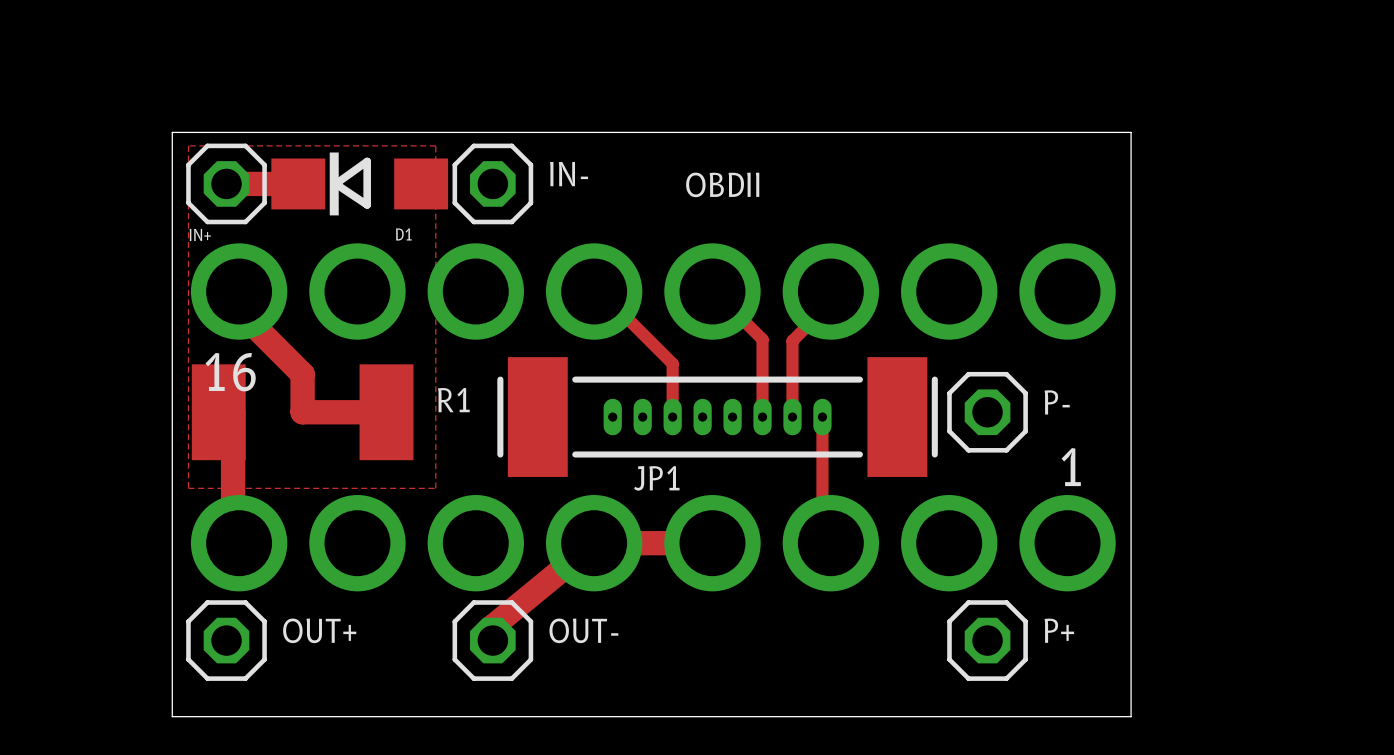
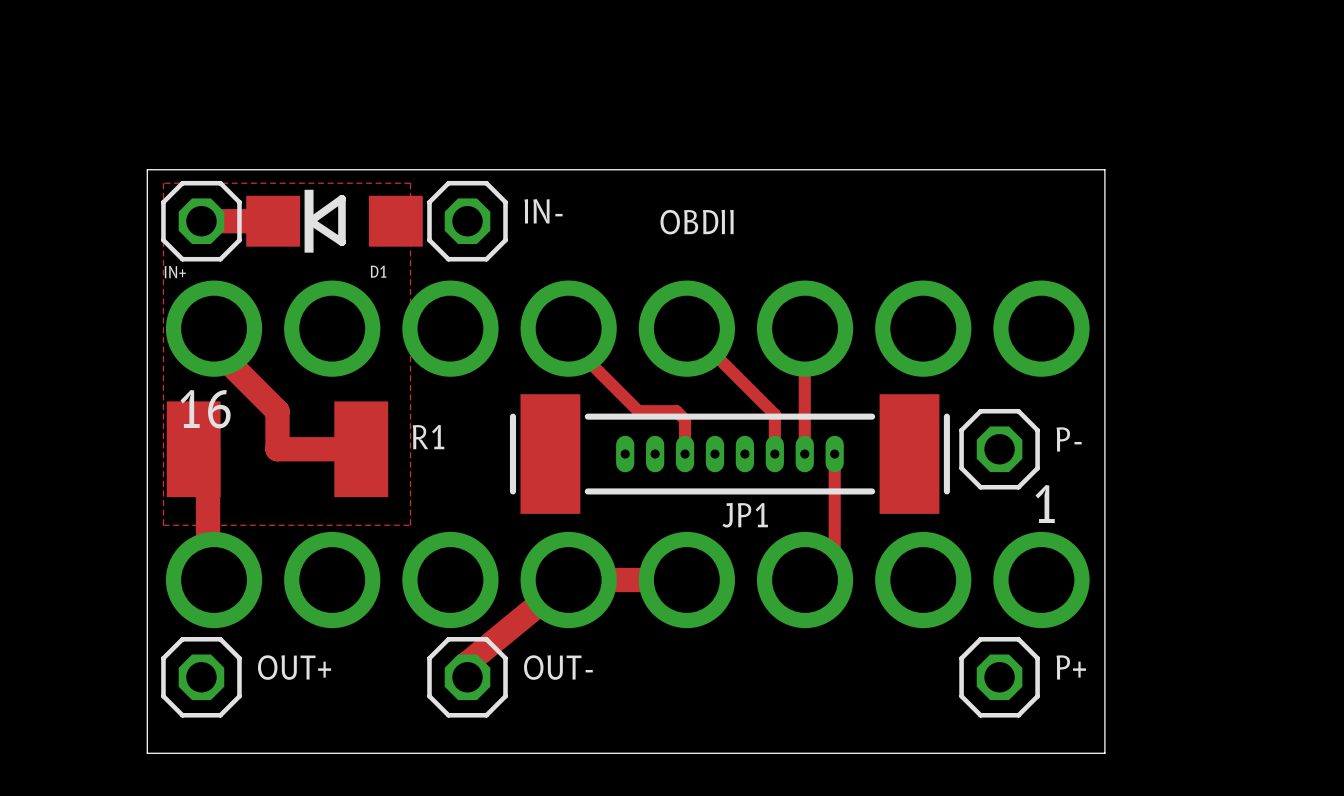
track: (830, 291) (816, 306) (816, 317) (792, 340) (792, 417) -> (804, 328) (804, 454)
track: (600, 298) (607, 298) (672, 363) (672, 417) -> (575, 335) (581, 341) (581, 354) (638, 411) (676, 411) (685, 419) (685, 454)
track: (762, 339) (762, 417) -> (736, 376) (774, 414) (774, 454)
P- position: (987, 412) -> (999, 449)
JP1 position: (717, 417) -> (729, 454)
track: (822, 417) (822, 534) (830, 543) -> (834, 454) (834, 550) (805, 580)
JP1 name position: JP1 (656, 478) -> JP1 (745, 515)
P+ position: (987, 640) -> (999, 677)

